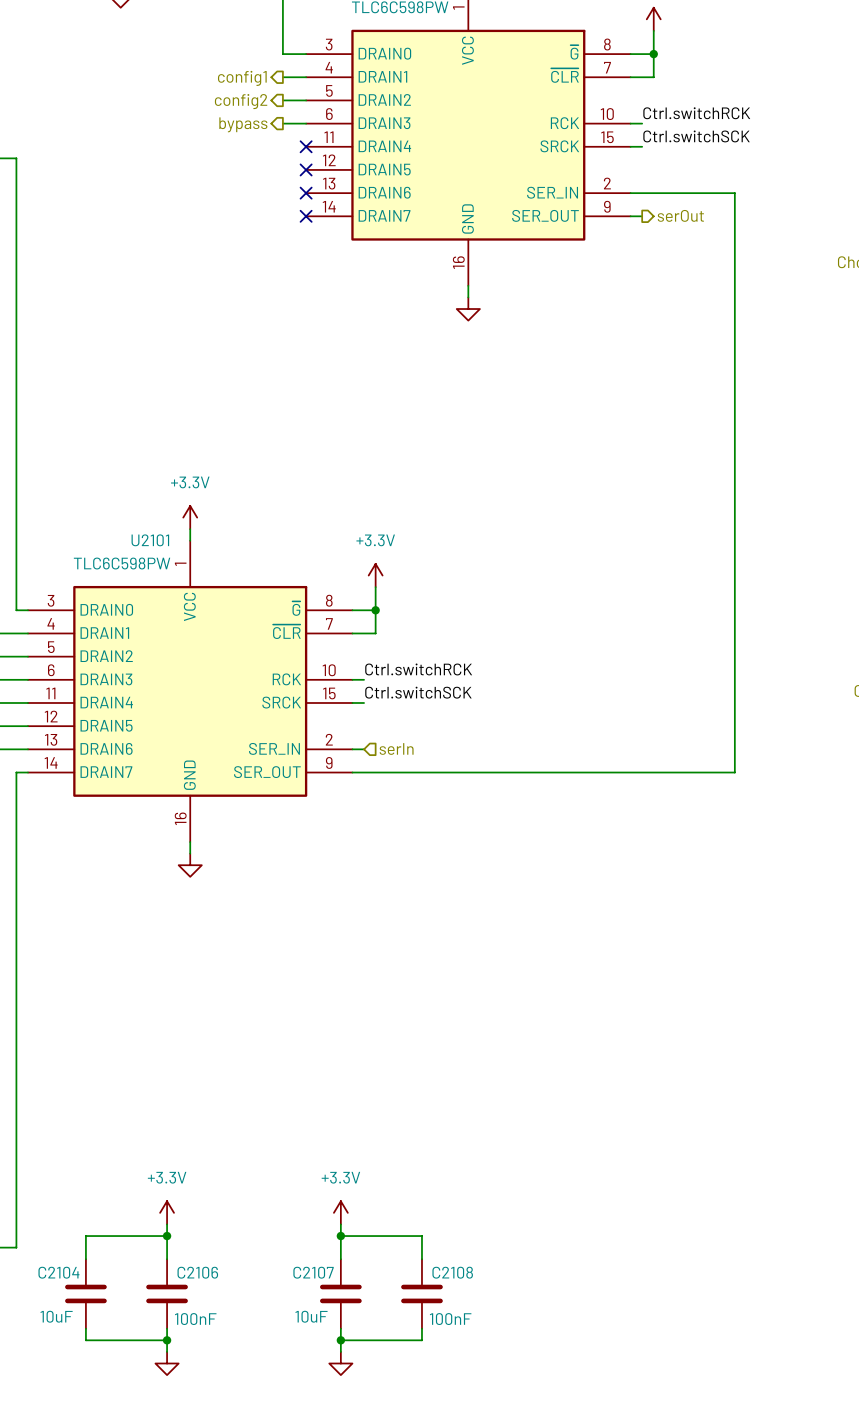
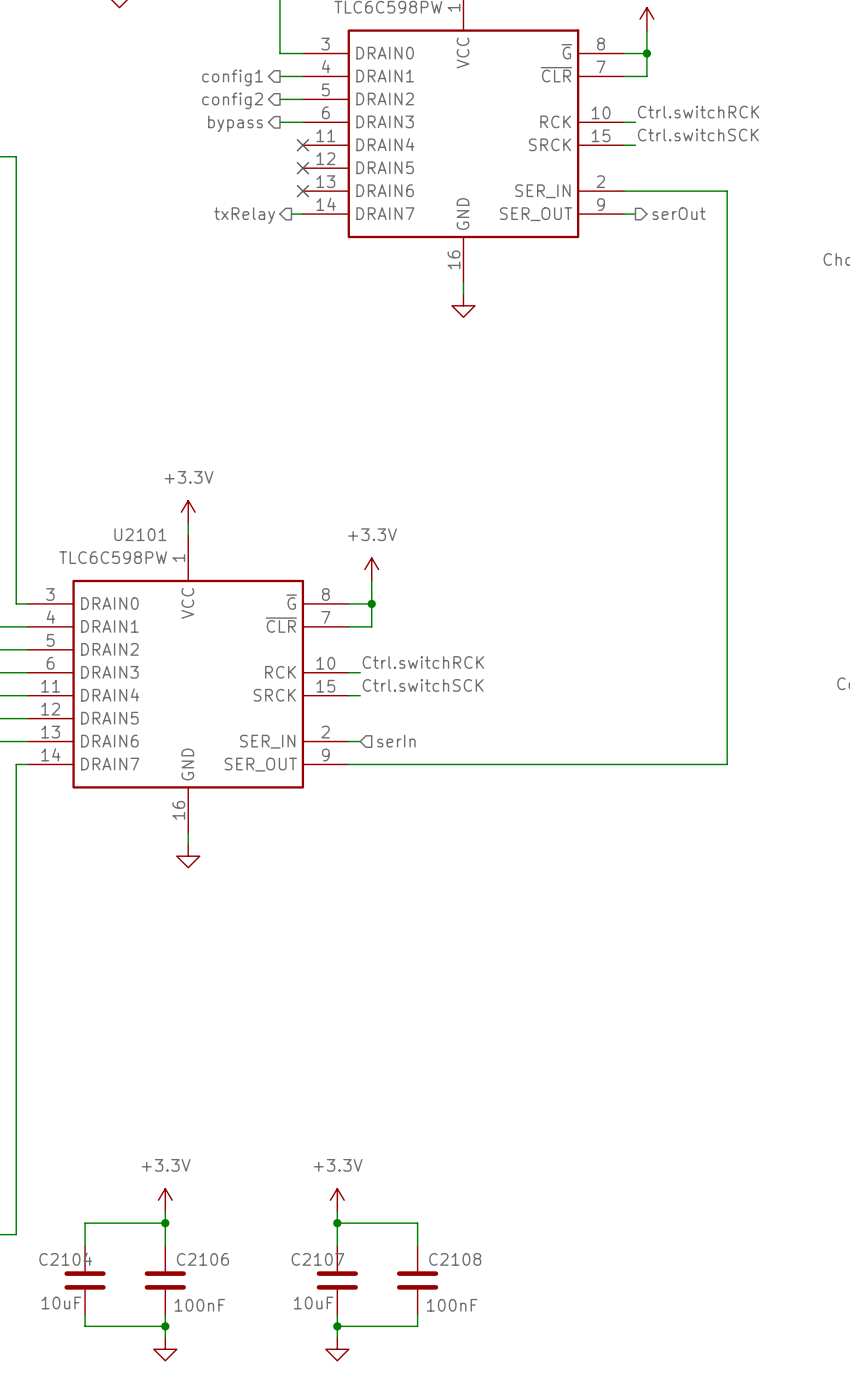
wire: none -> (291, 214) (302, 214)
no-connect mark: (306, 216) -> none
hierarchical label: none -> txRelay (244, 215)

